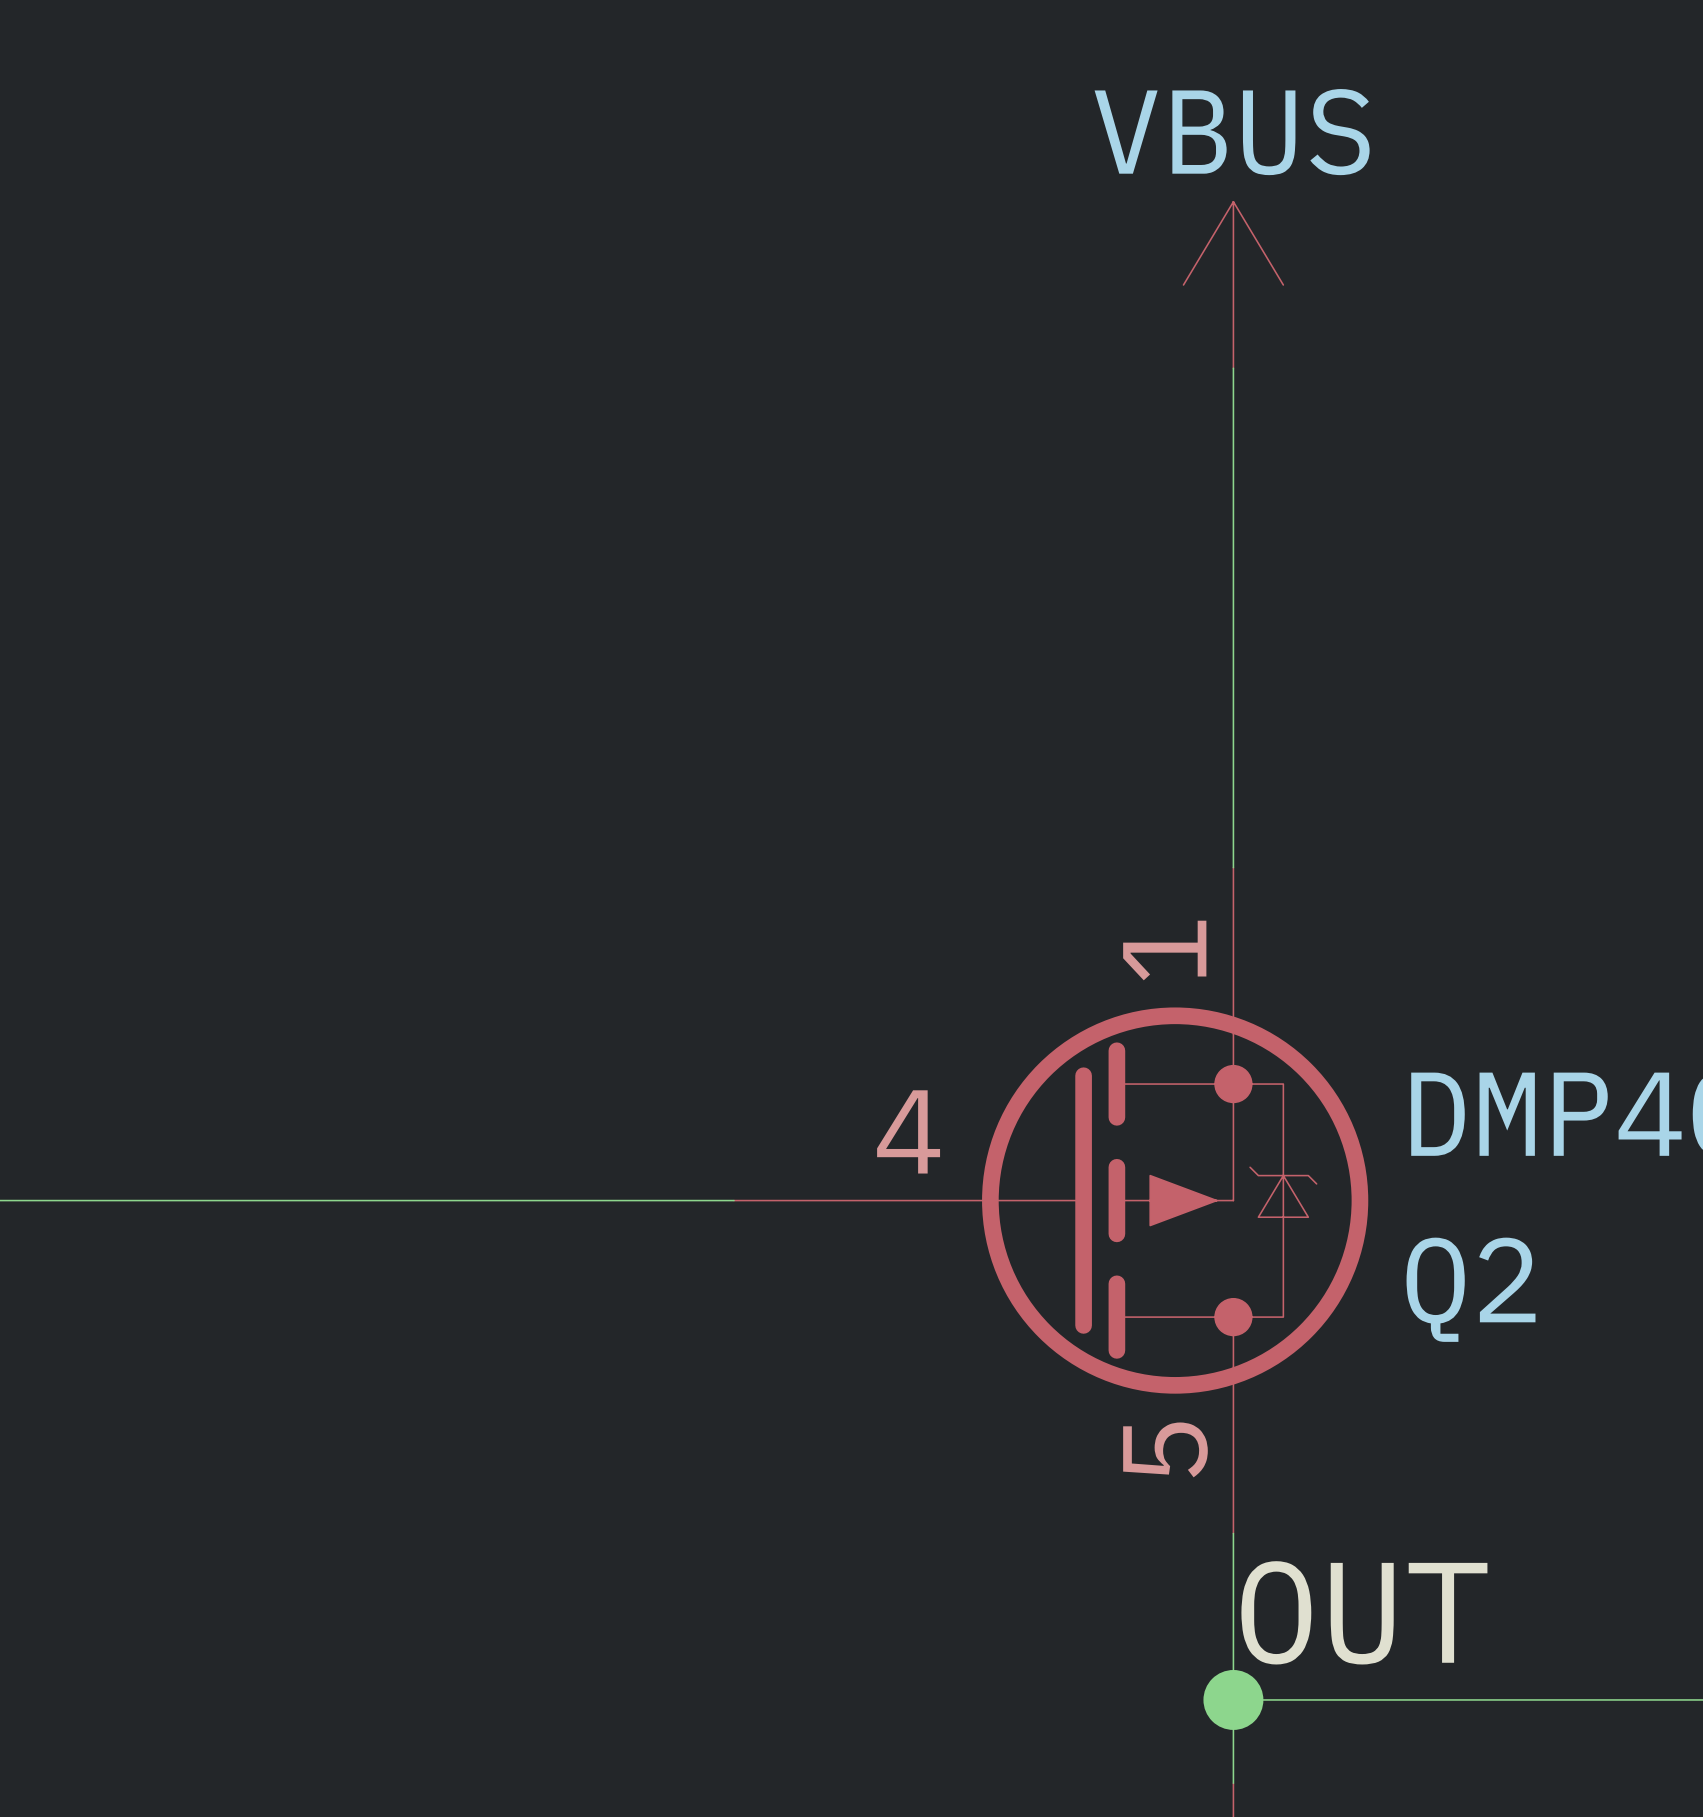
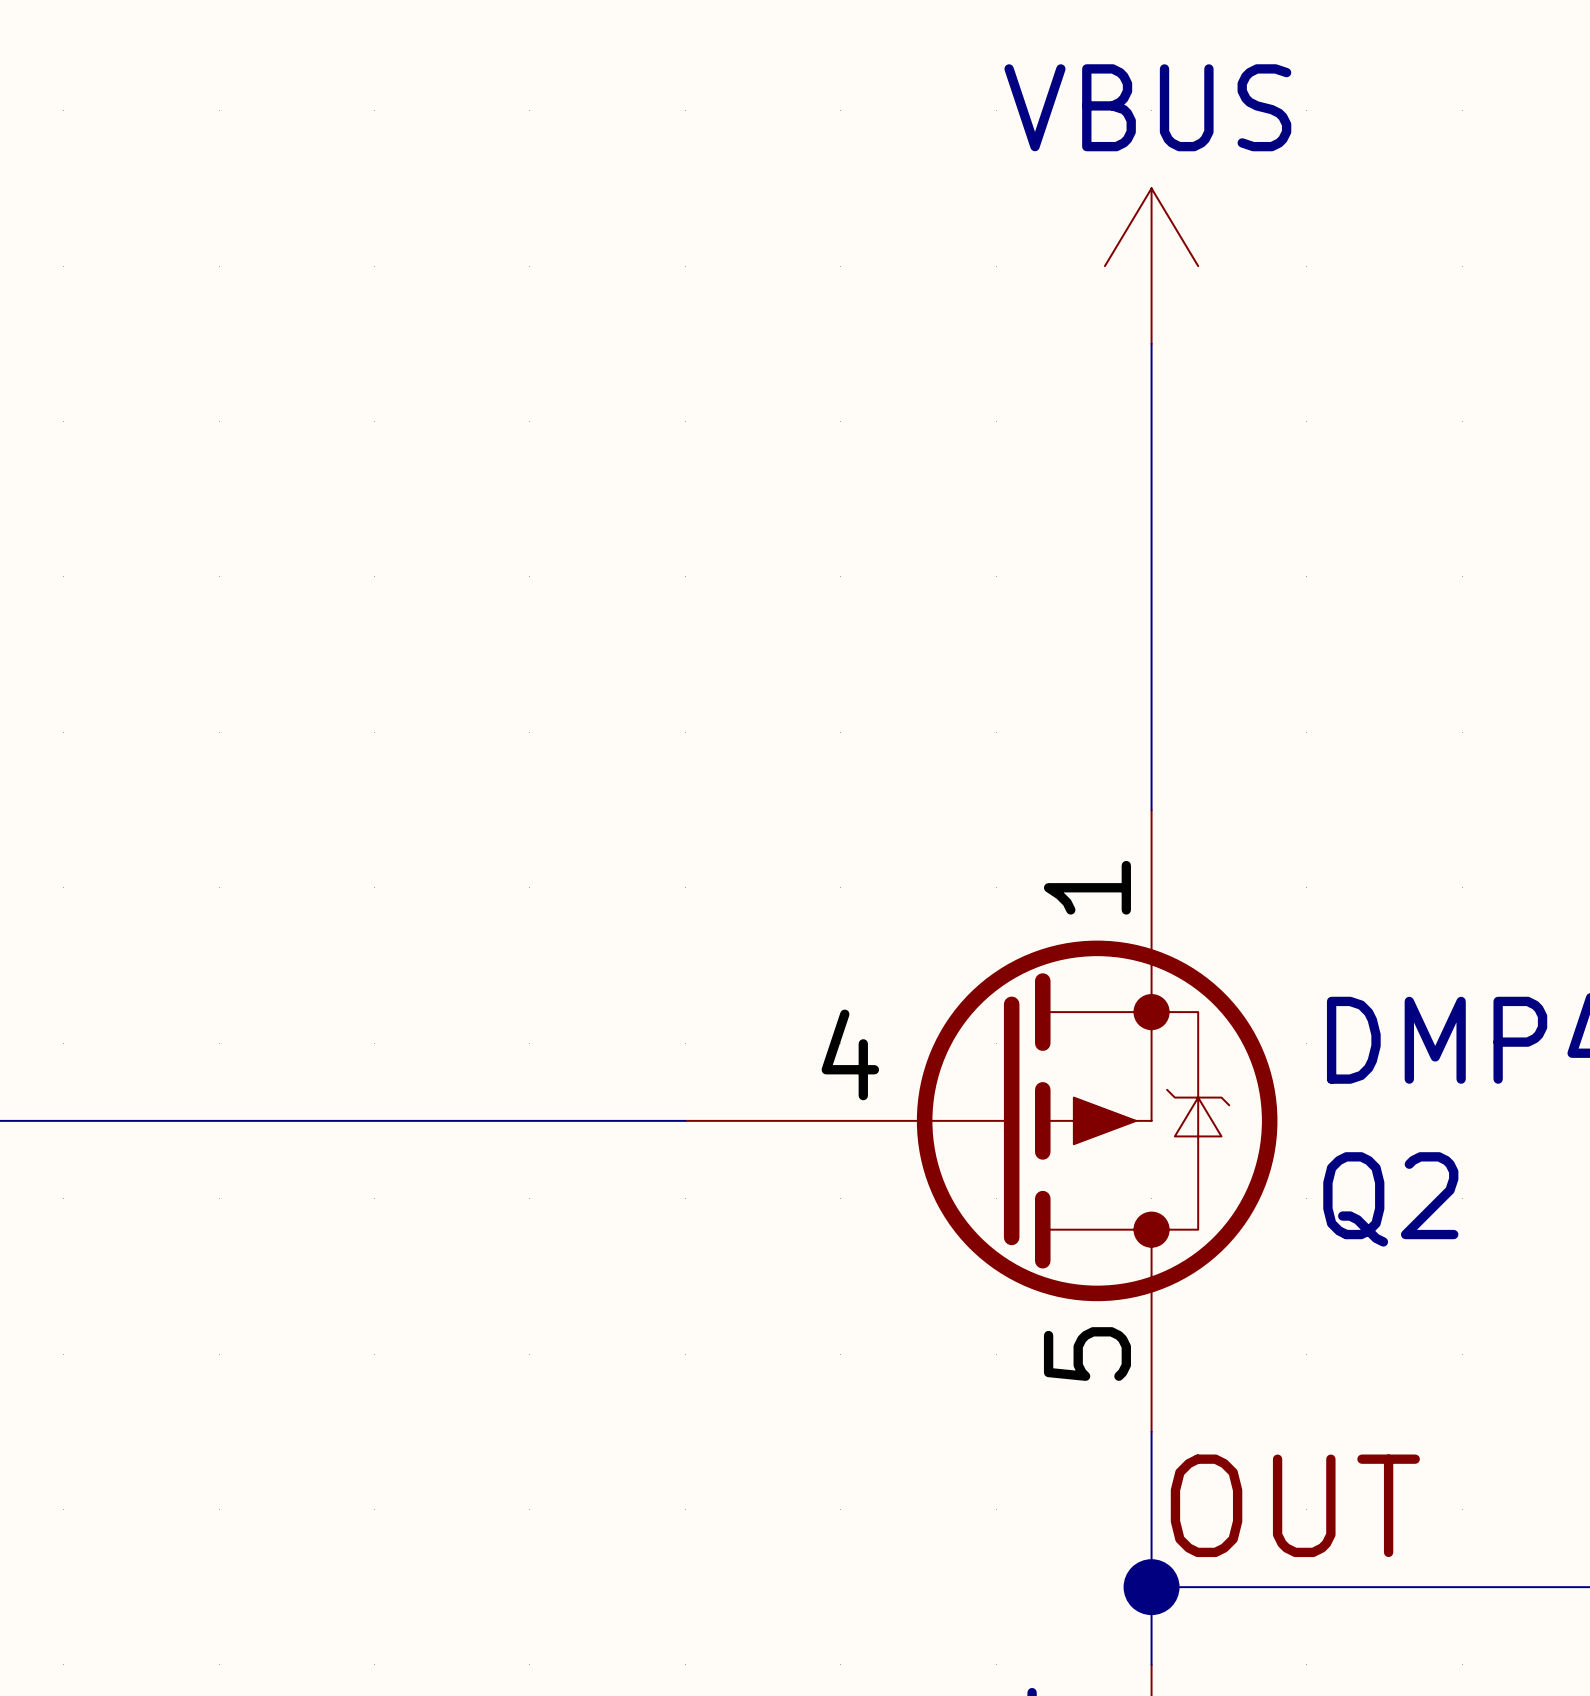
power symbol text position: VBUS (1232, 132) -> VBUS (1147, 107)

